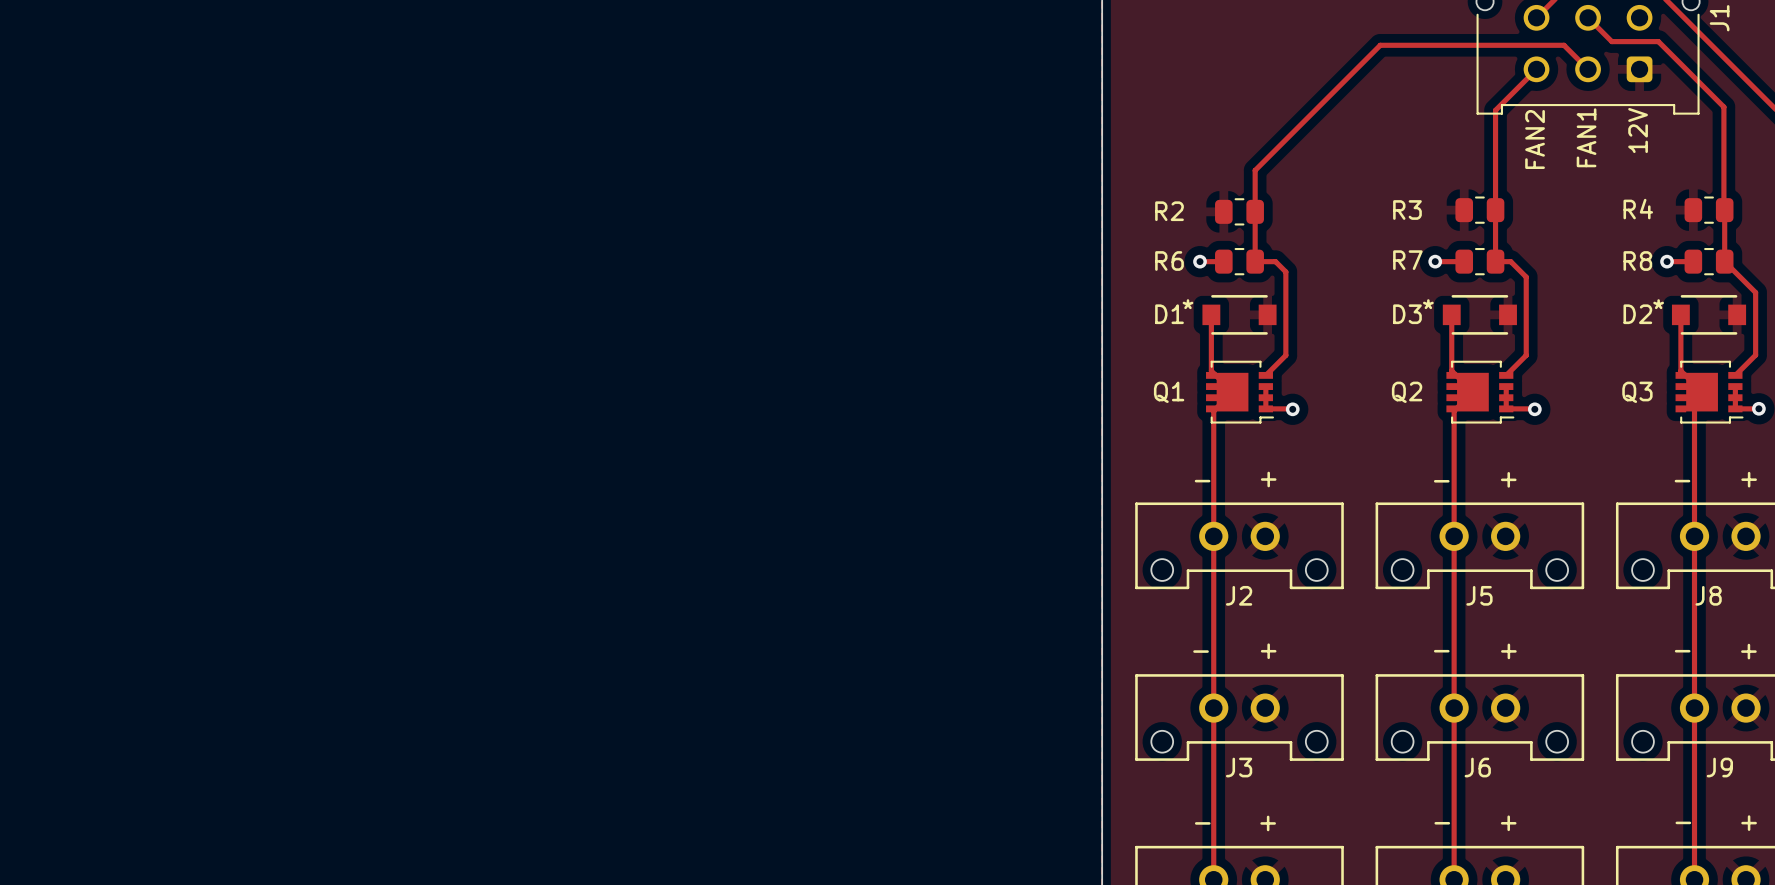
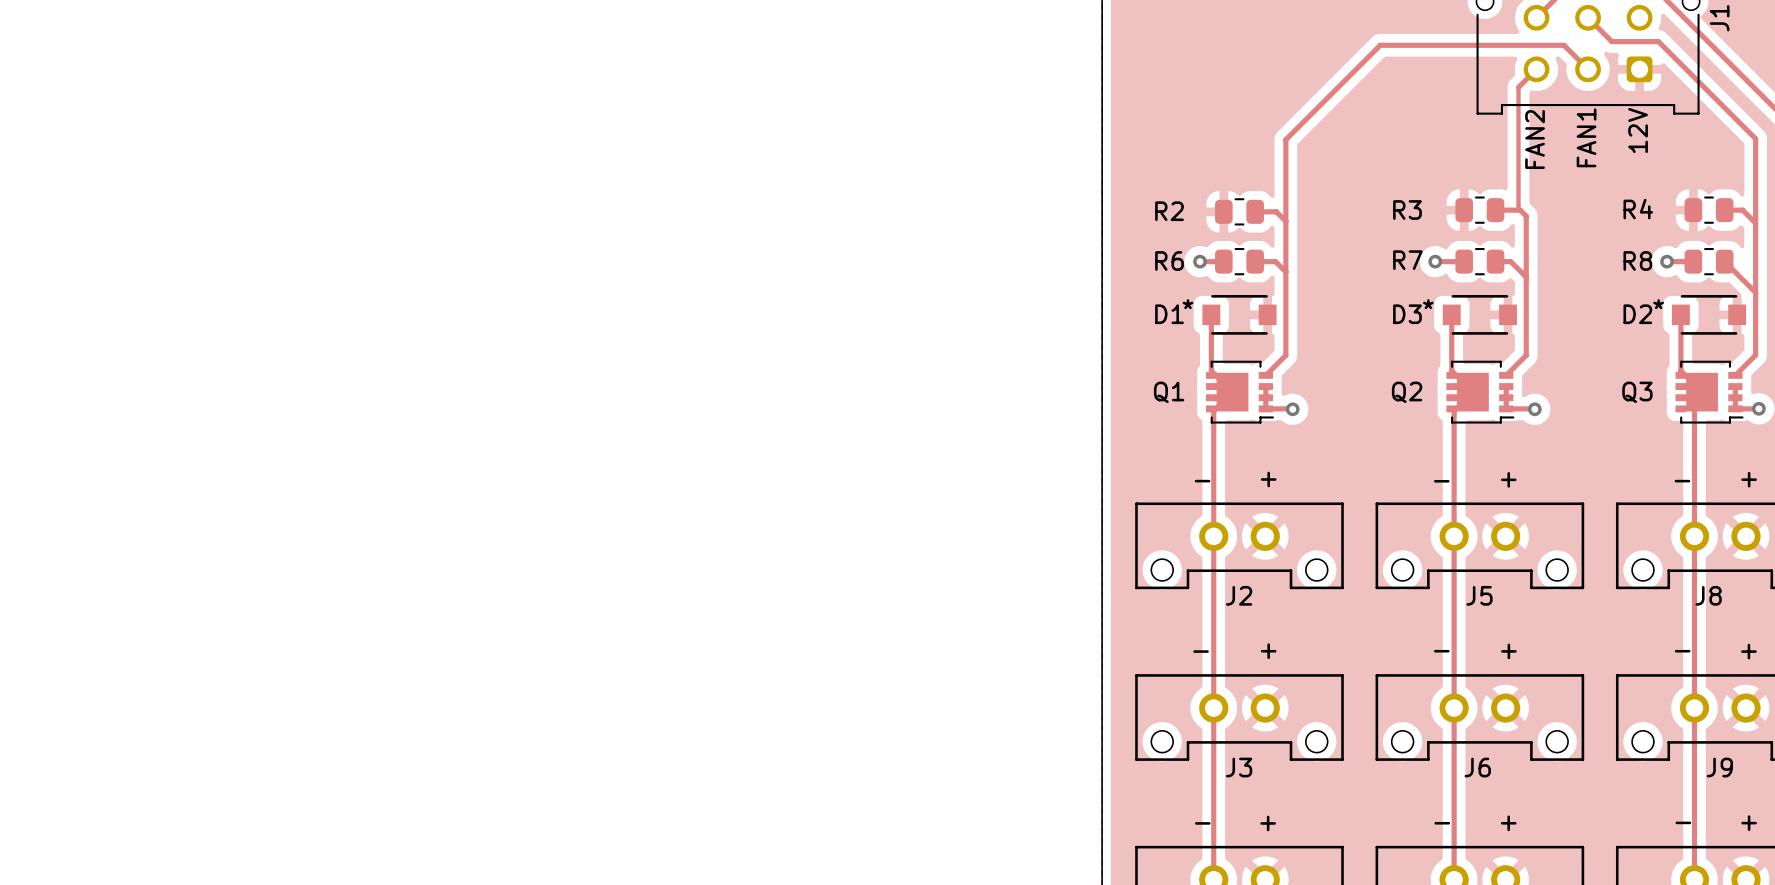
track: (1518, 87) (1495, 110) (1495, 261) -> (1518, 87) (1518, 208)
track: (1723, 107) (1723, 210) -> (1723, 107) (1755, 138) (1755, 292)
track: (1285, 139) (1255, 170) (1255, 261) -> (1285, 139) (1285, 271)
track: none -> (1495, 210) (1520, 210) (1526, 216) (1526, 277)
track: (1724, 210) (1724, 261) -> (1724, 210) (1742, 210) (1755, 223)
track: none -> (1255, 211) (1276, 211) (1285, 221)

